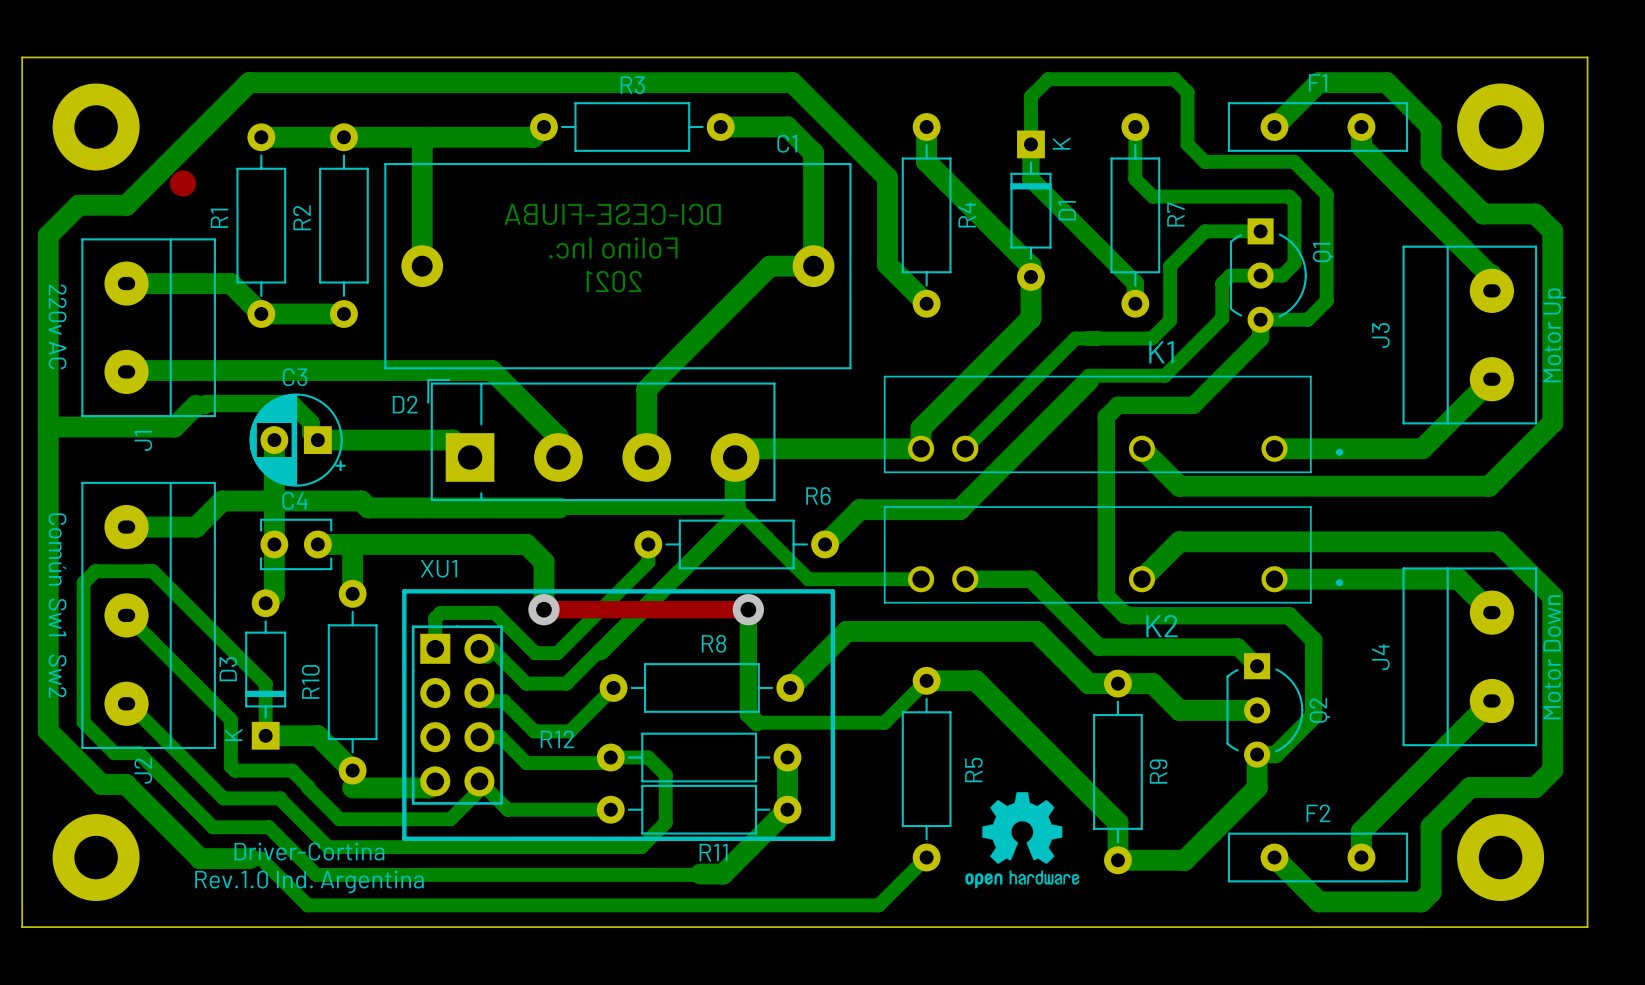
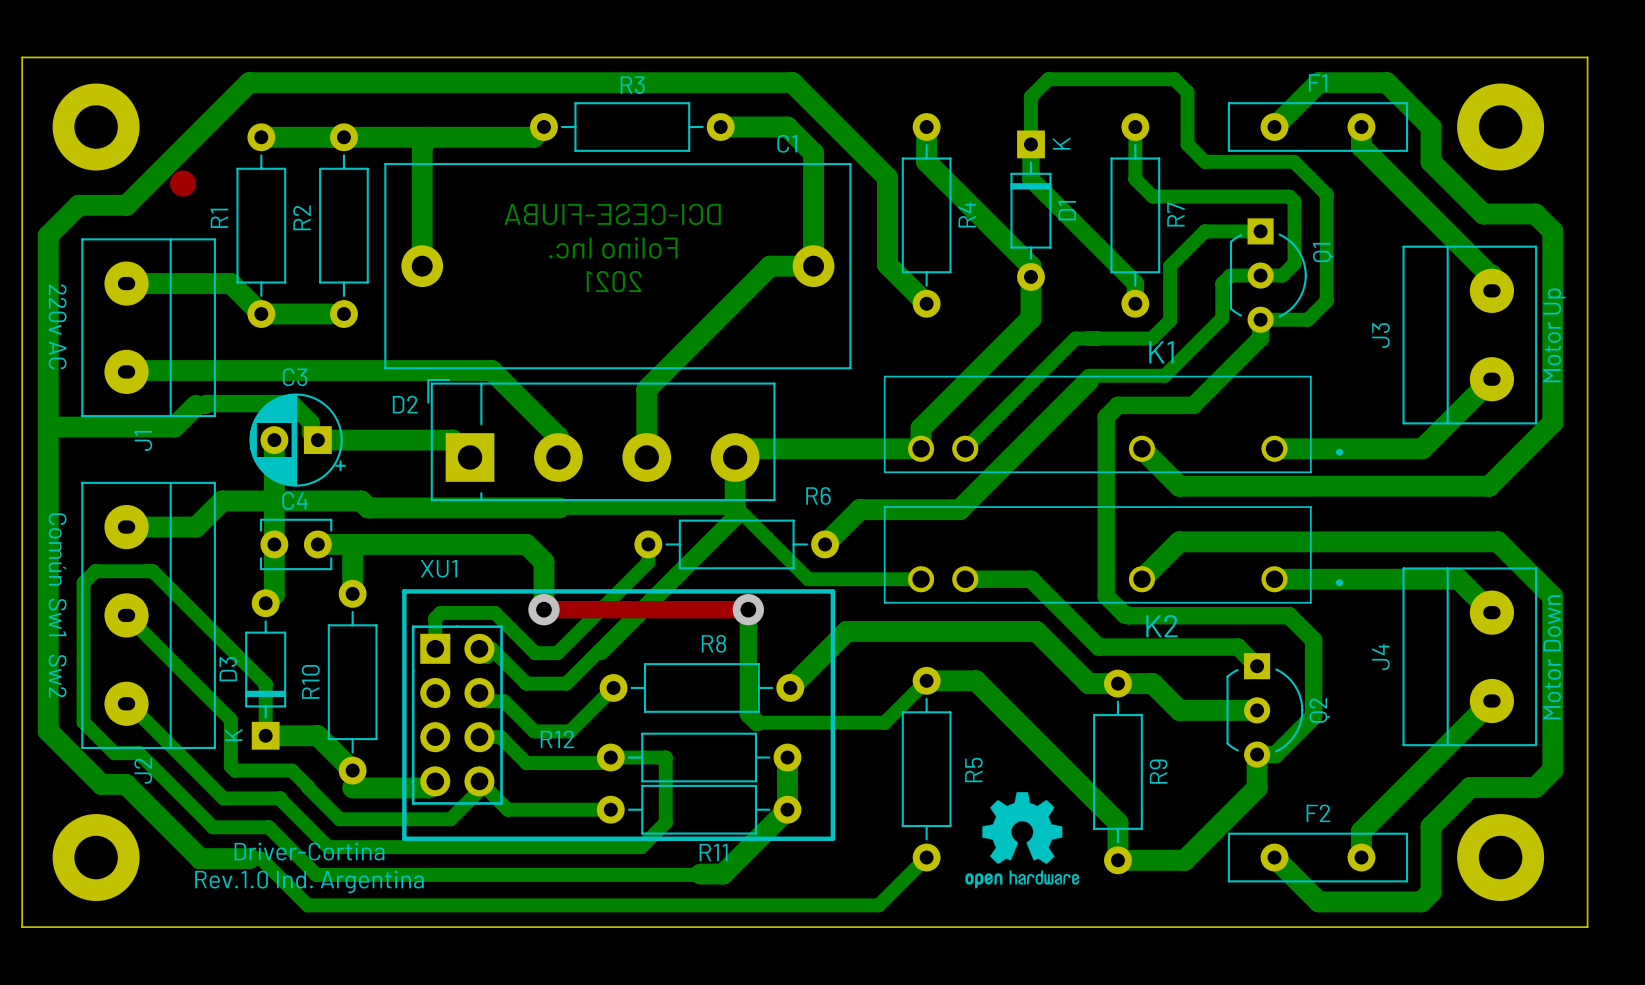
bottom track: (648, 757) (665, 774) -> (648, 757) (665, 757) (665, 774)

